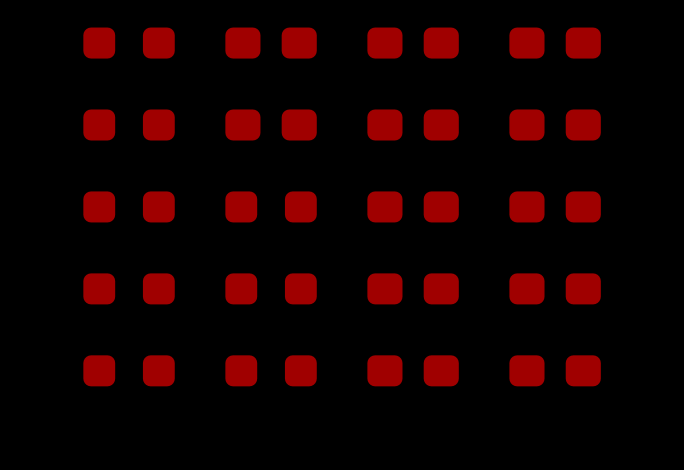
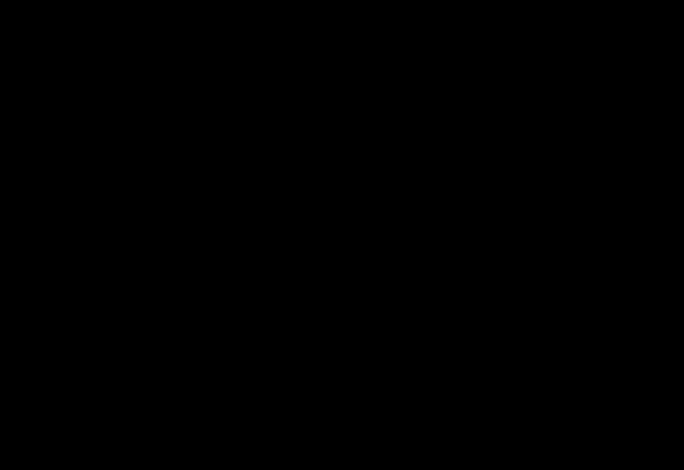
part: (129, 43) -> none
part: (271, 43) -> none
part: (413, 43) -> none
part: (555, 43) -> none
part: (129, 124) -> none
part: (271, 124) -> none
part: (413, 124) -> none
part: (555, 124) -> none
part: (129, 206) -> none
part: (271, 206) -> none
part: (413, 206) -> none
part: (555, 206) -> none
part: (129, 288) -> none
part: (271, 288) -> none
part: (413, 288) -> none
part: (555, 288) -> none
part: (129, 370) -> none
part: (271, 370) -> none
part: (413, 370) -> none
part: (555, 370) -> none

